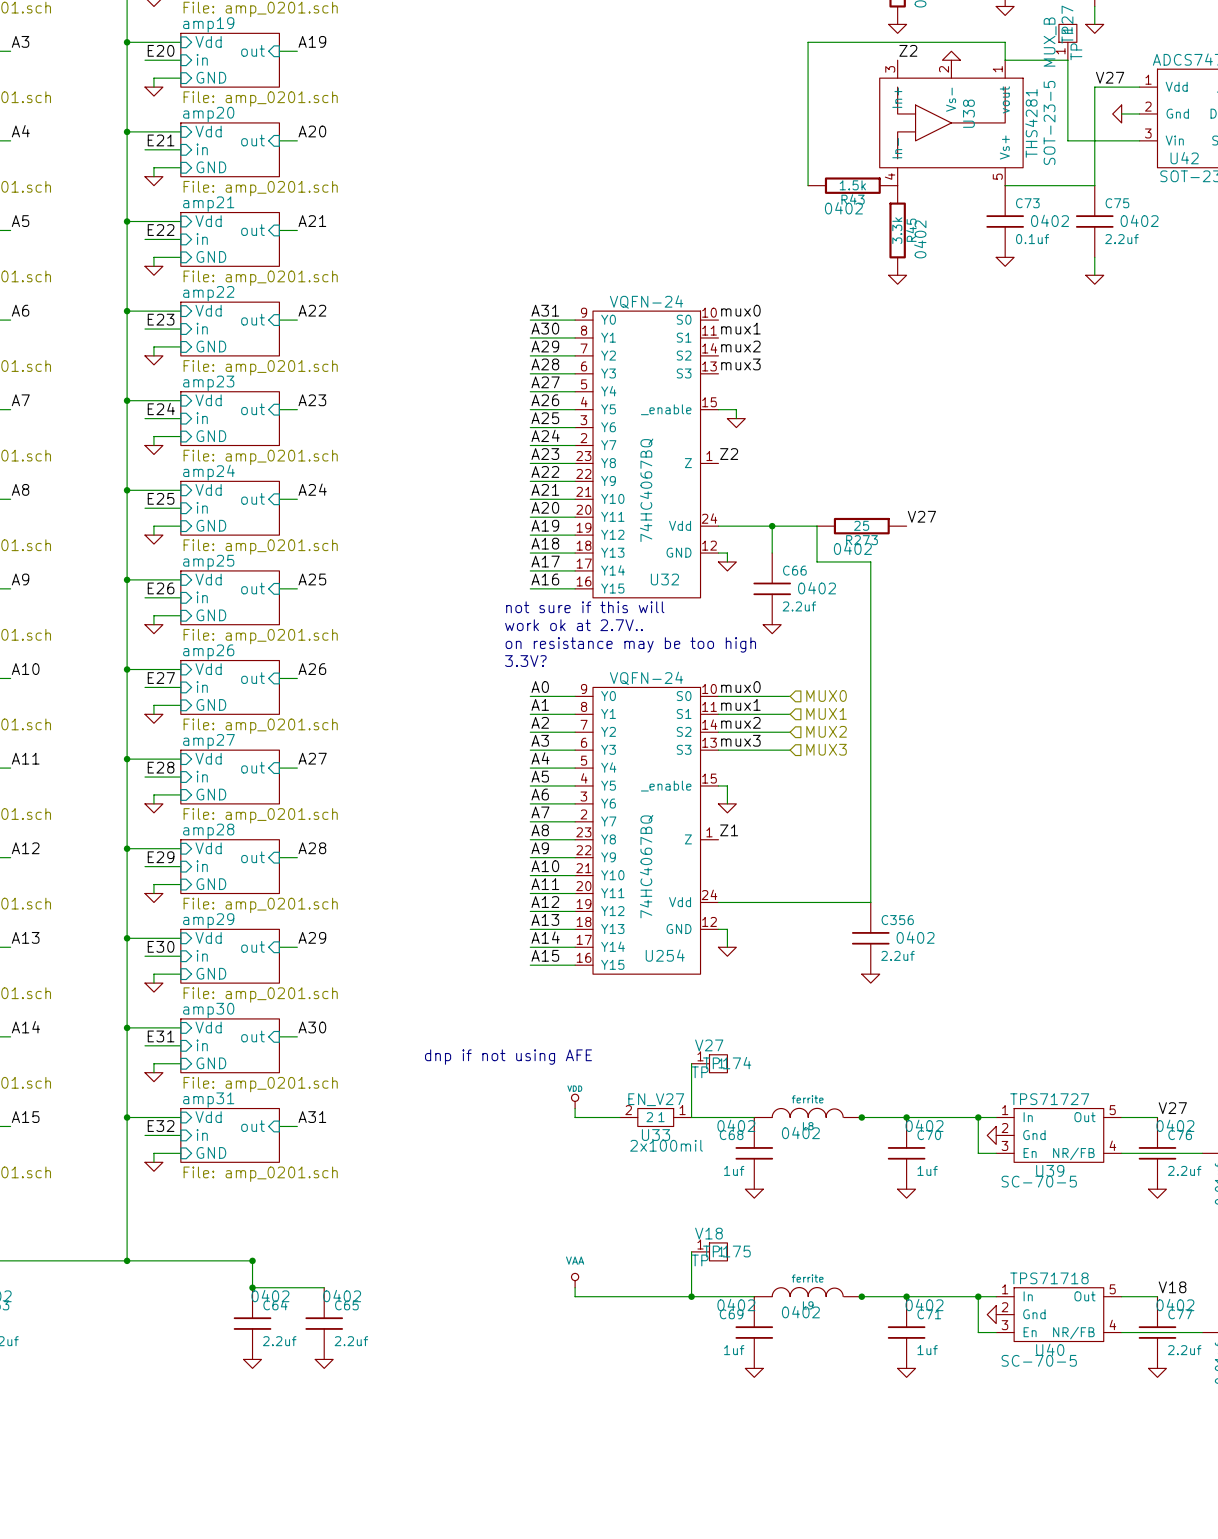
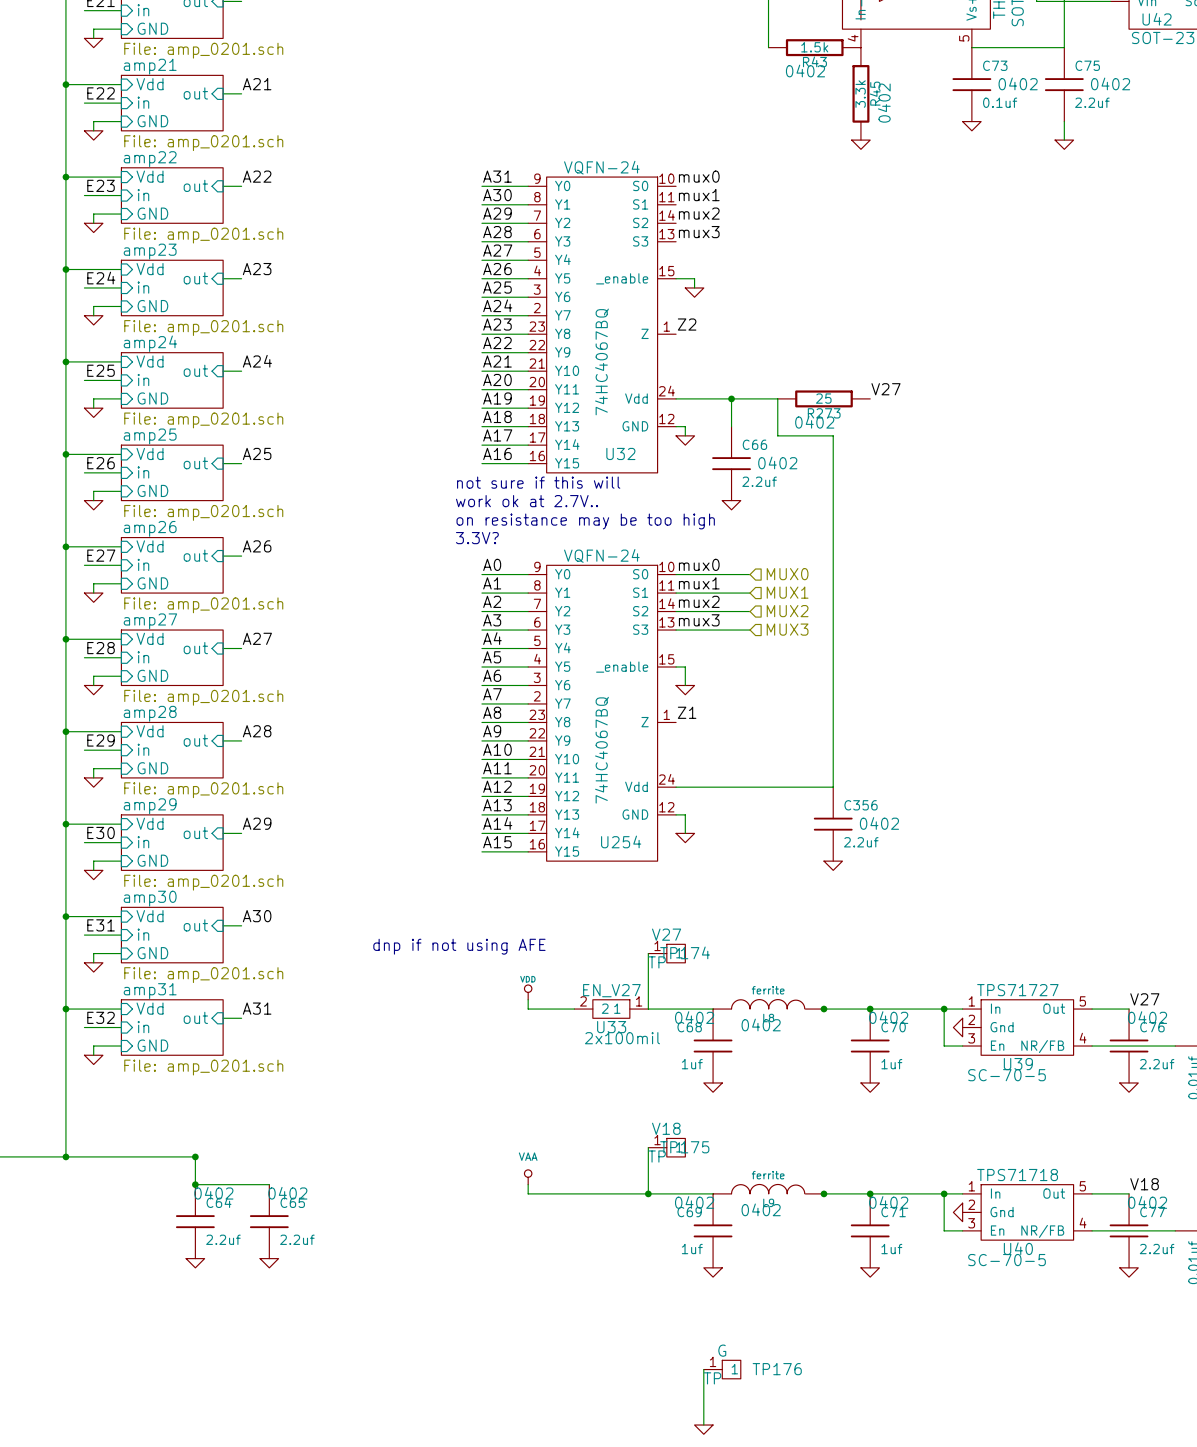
wire: none -> (703, 1369) (703, 1425)
TP176: none -> G (722, 1369)
power symbol: none -> (703, 1429)

